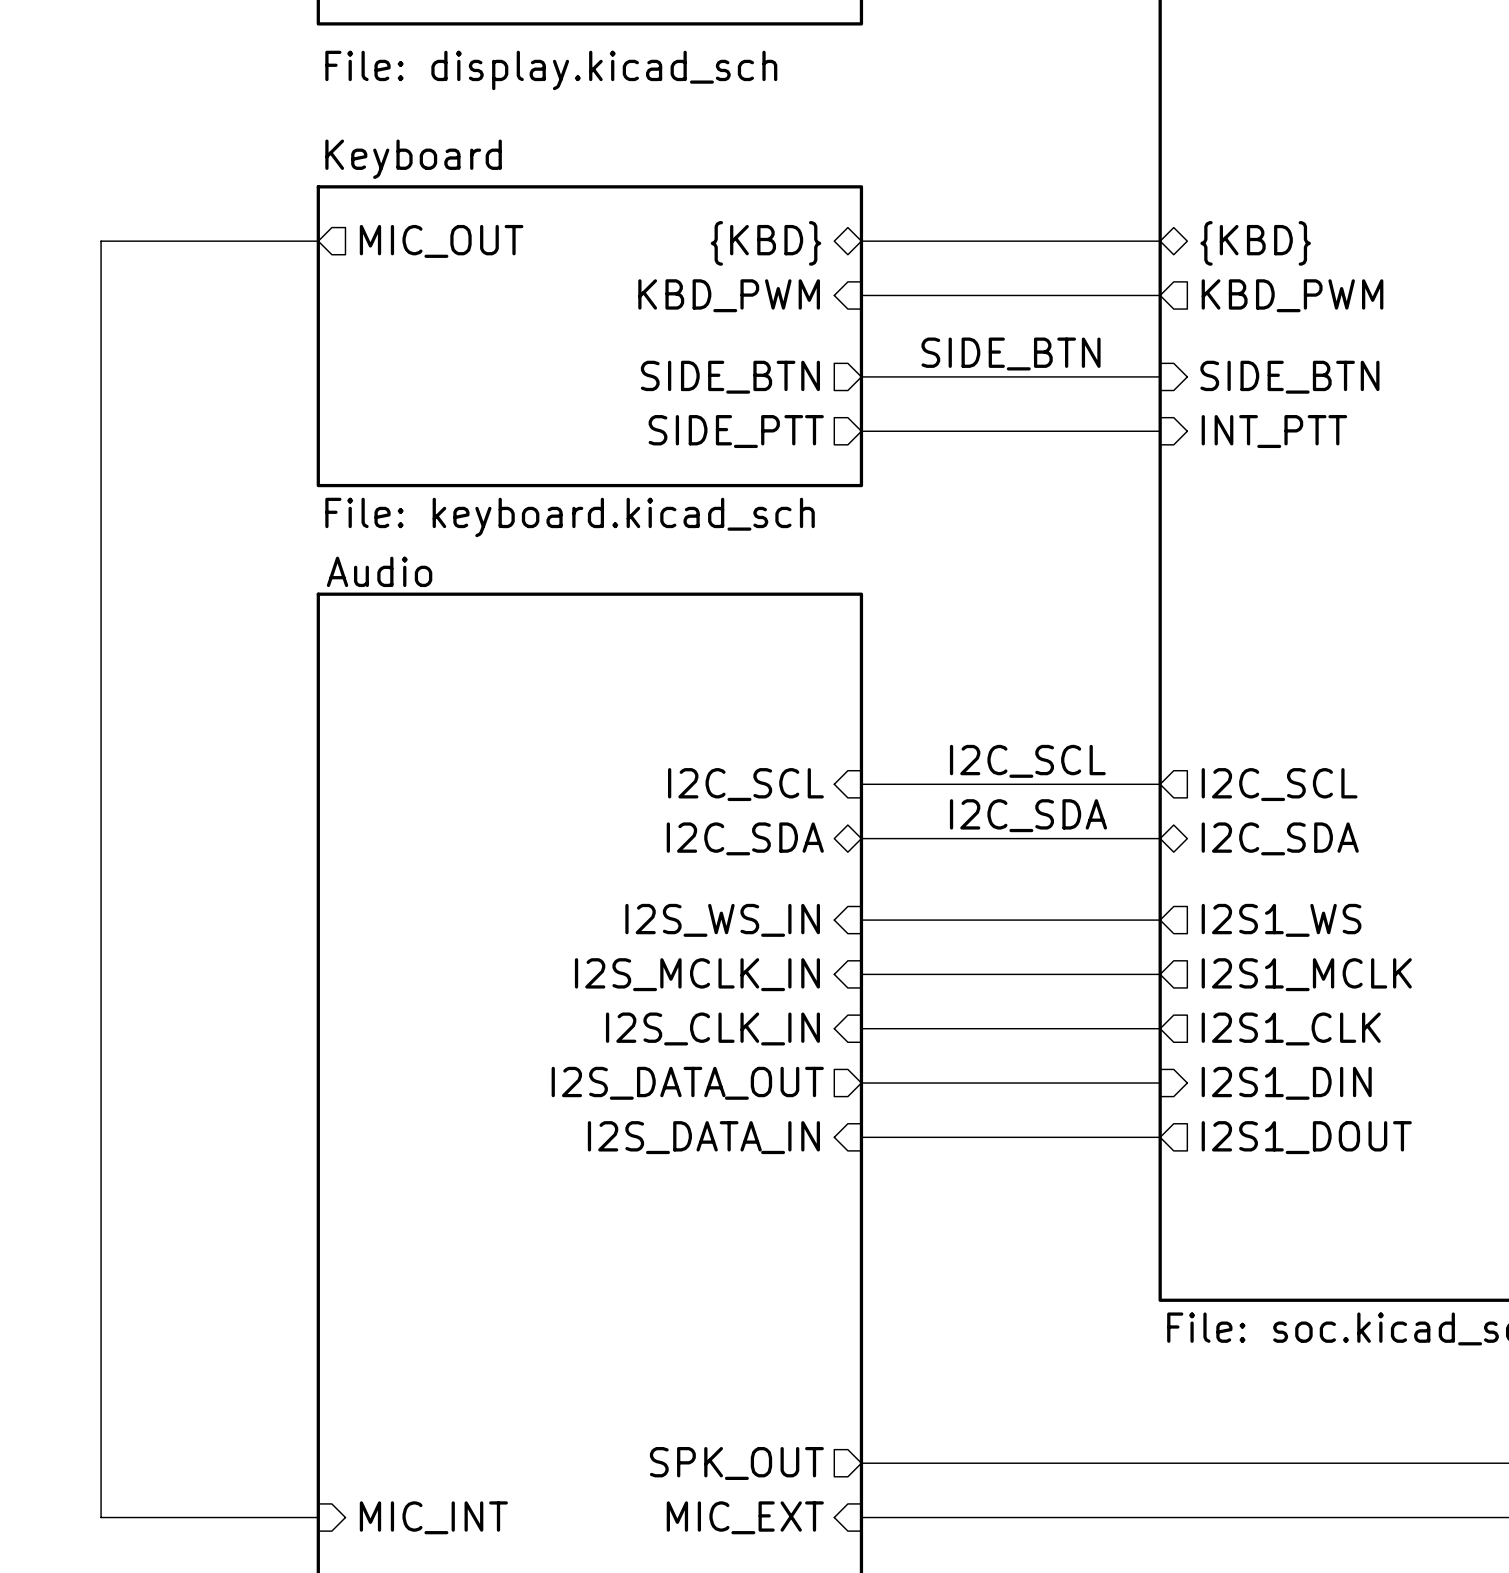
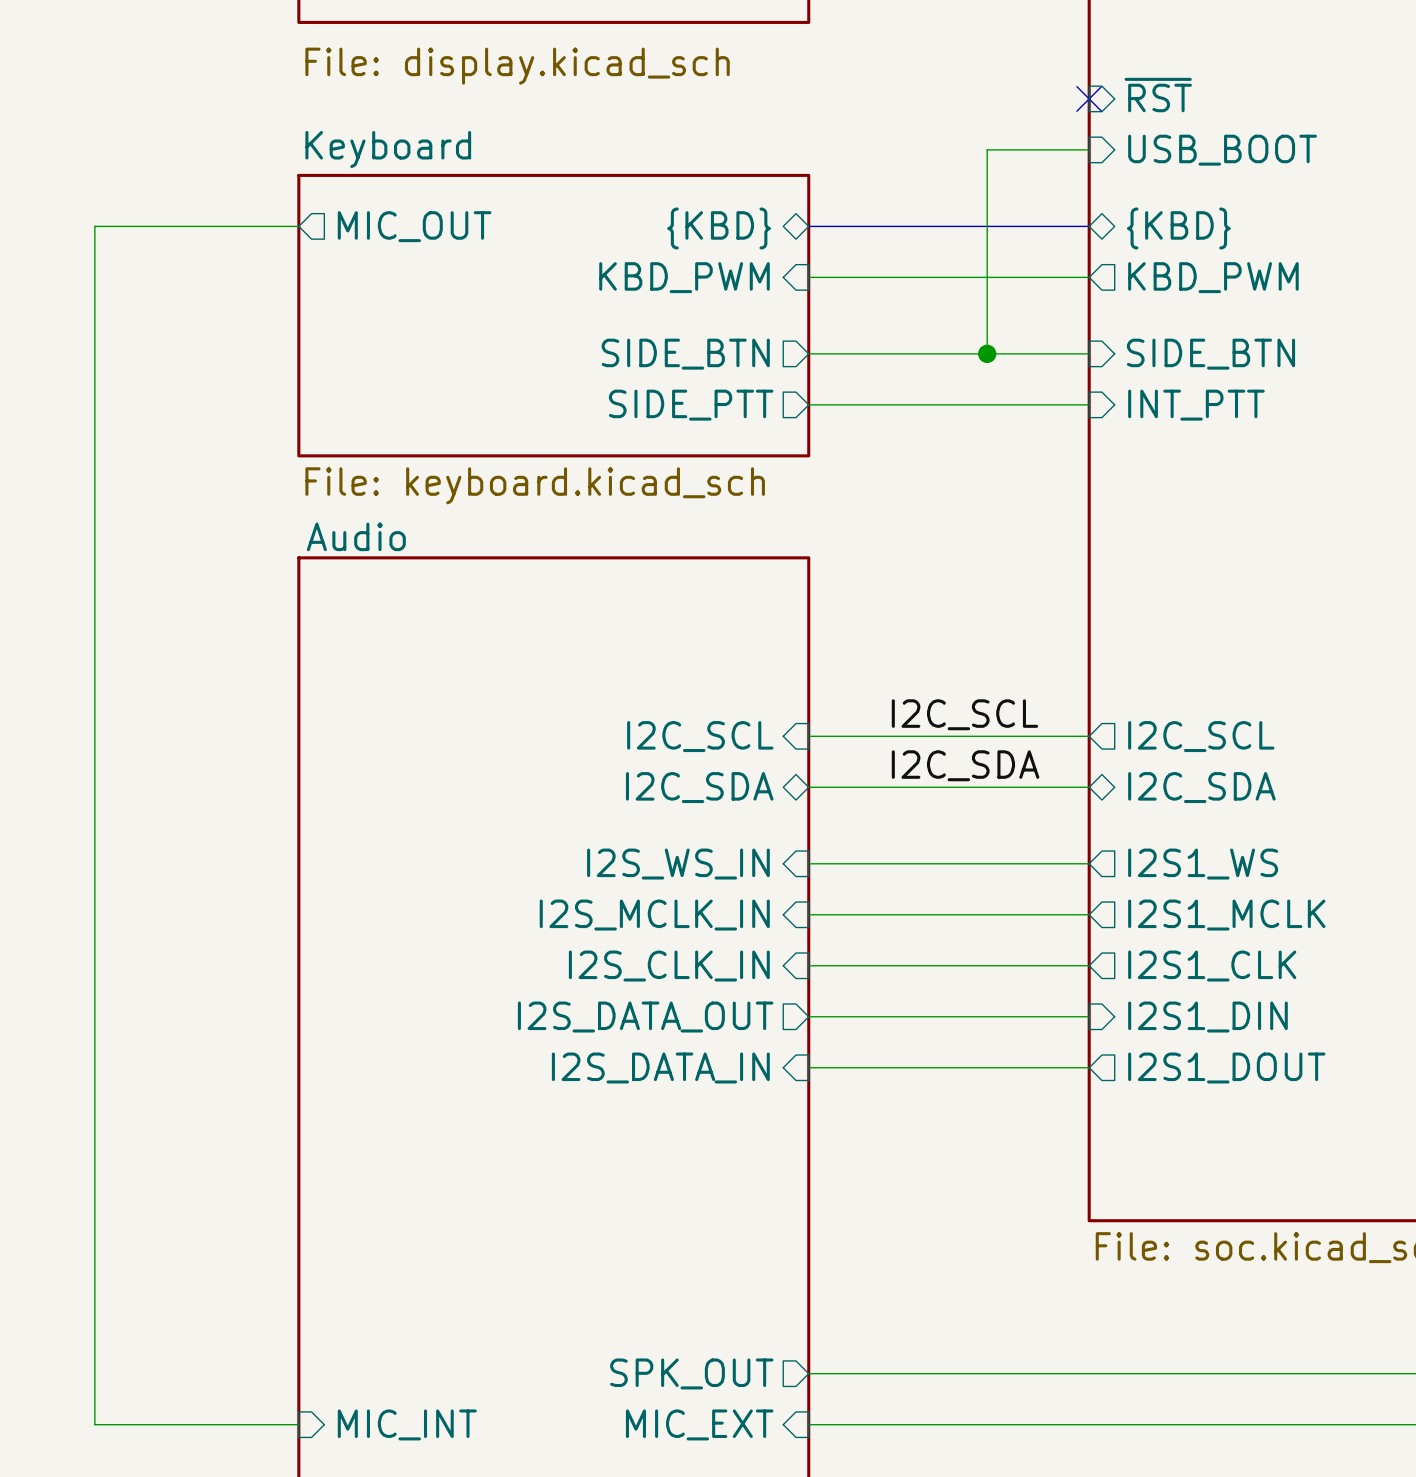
sheet pin: none -> ~{RST} (1158, 95)
no-connect mark: none -> (1089, 98)
wire: none -> (1089, 149) (987, 149) (987, 353)
sheet pin: none -> USB_BOOT (1222, 150)
label: SIDE_BTN (1011, 354) -> none
junction: none -> (987, 353)

